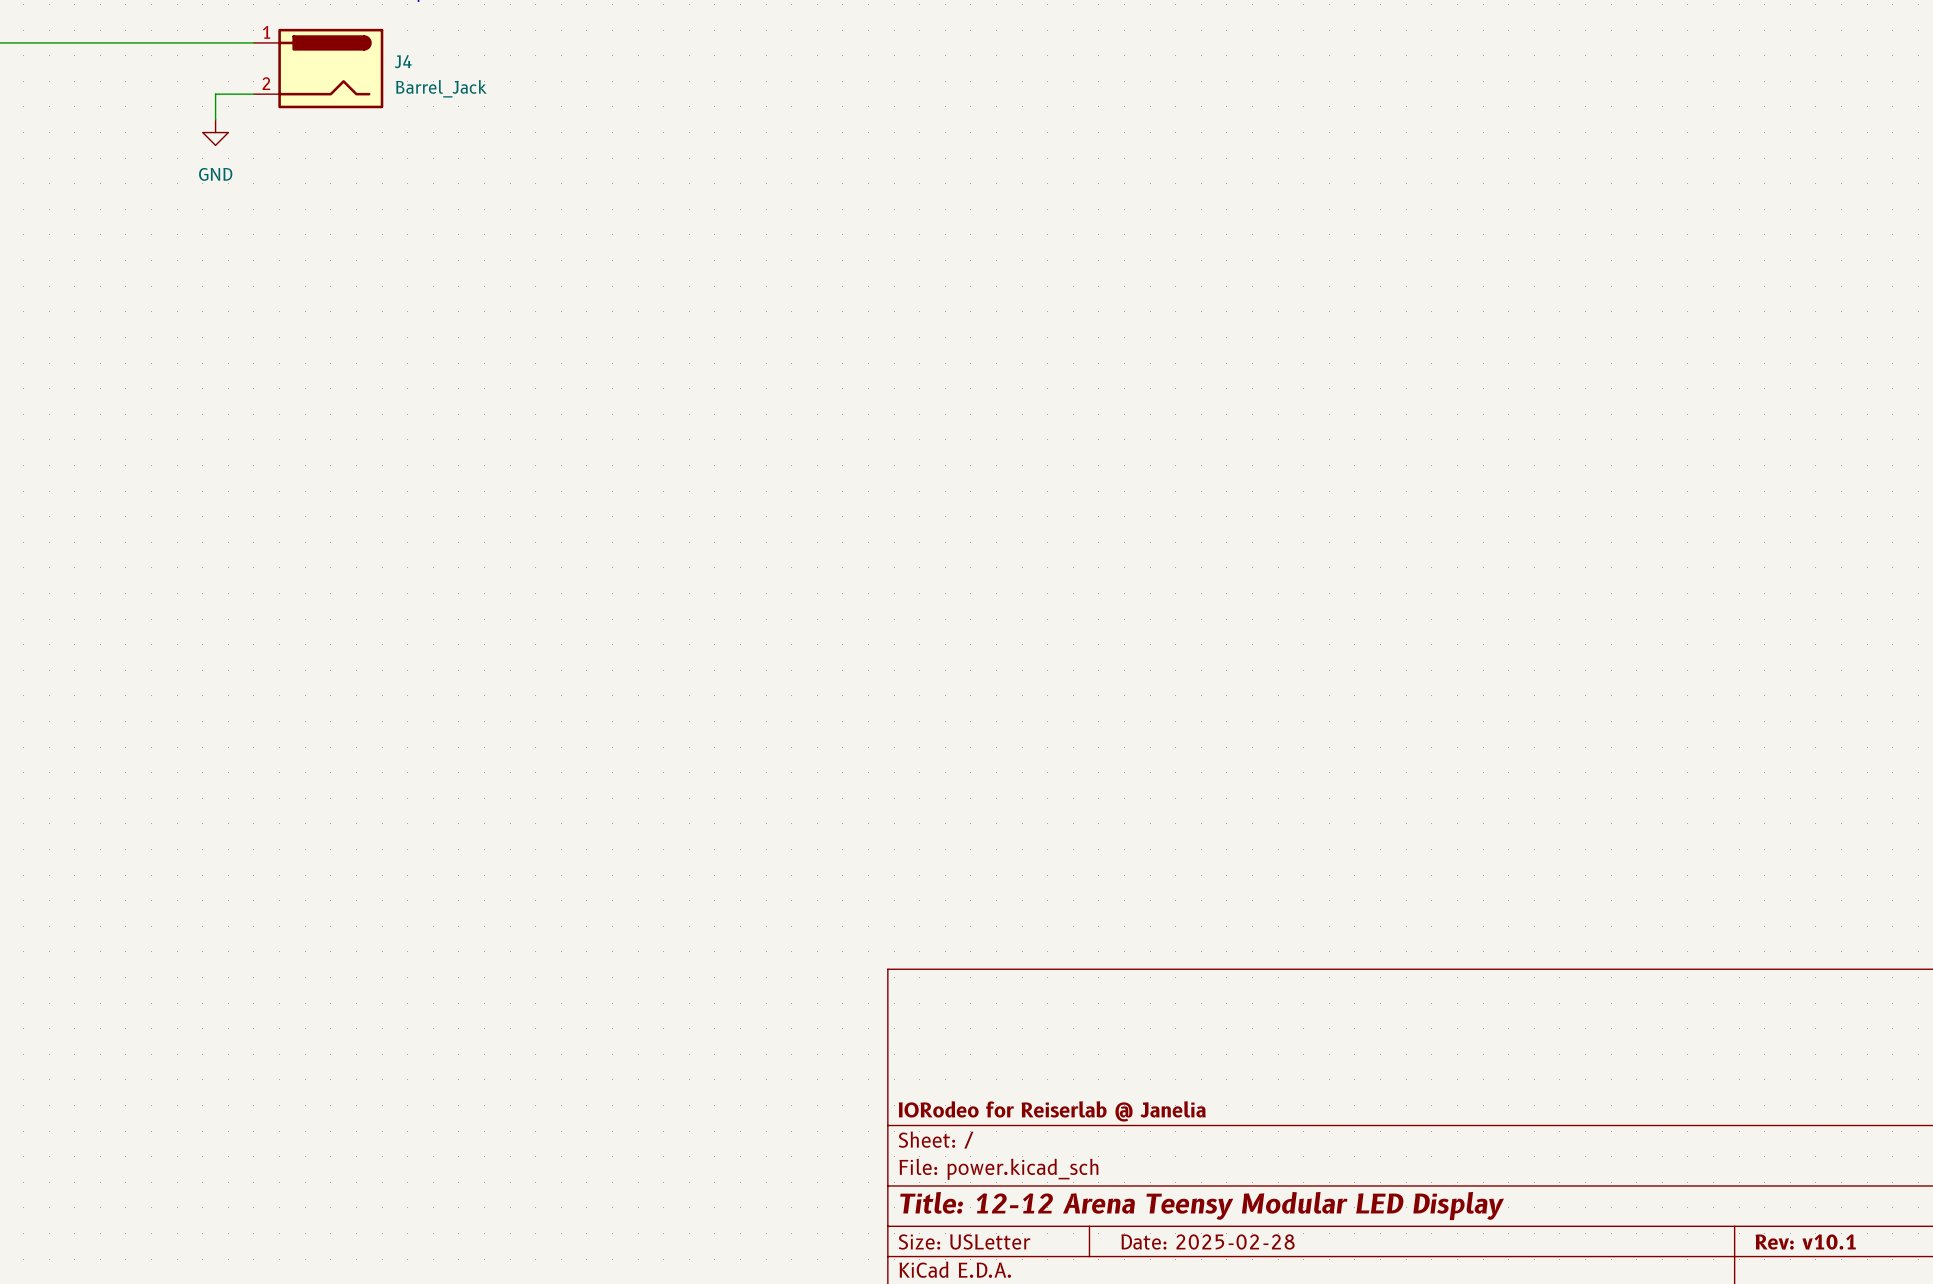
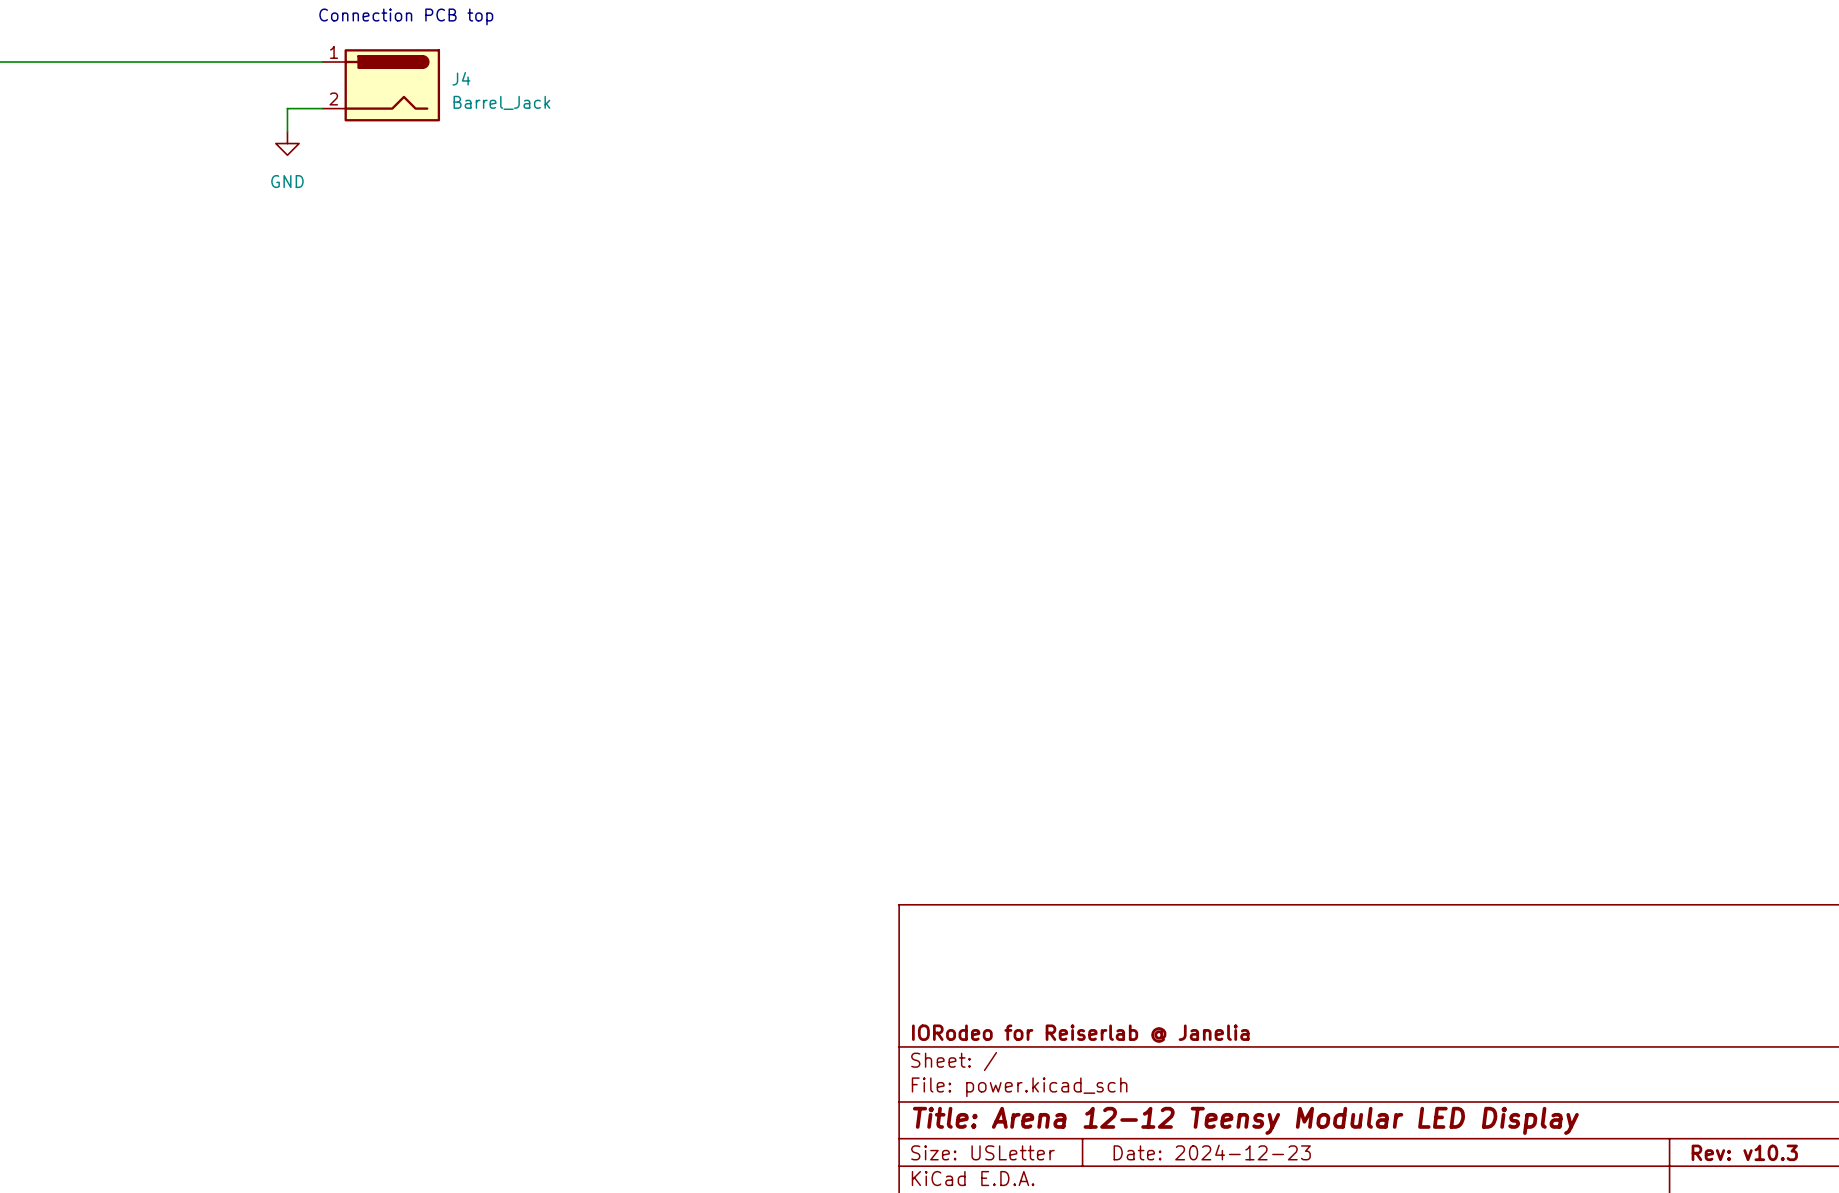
title block: Title: 12-12 Arena Teensy Modular LED Display (1202, 1205) -> Title: Arena 12-12 Teensy Modular LED Display (1245, 1120)
title block: Date: 2025-02-28 (1208, 1241) -> Date: 2024-12-23 (1212, 1152)
title block: Rev: v10.1 (1805, 1242) -> Rev: v10.3 (1744, 1152)

